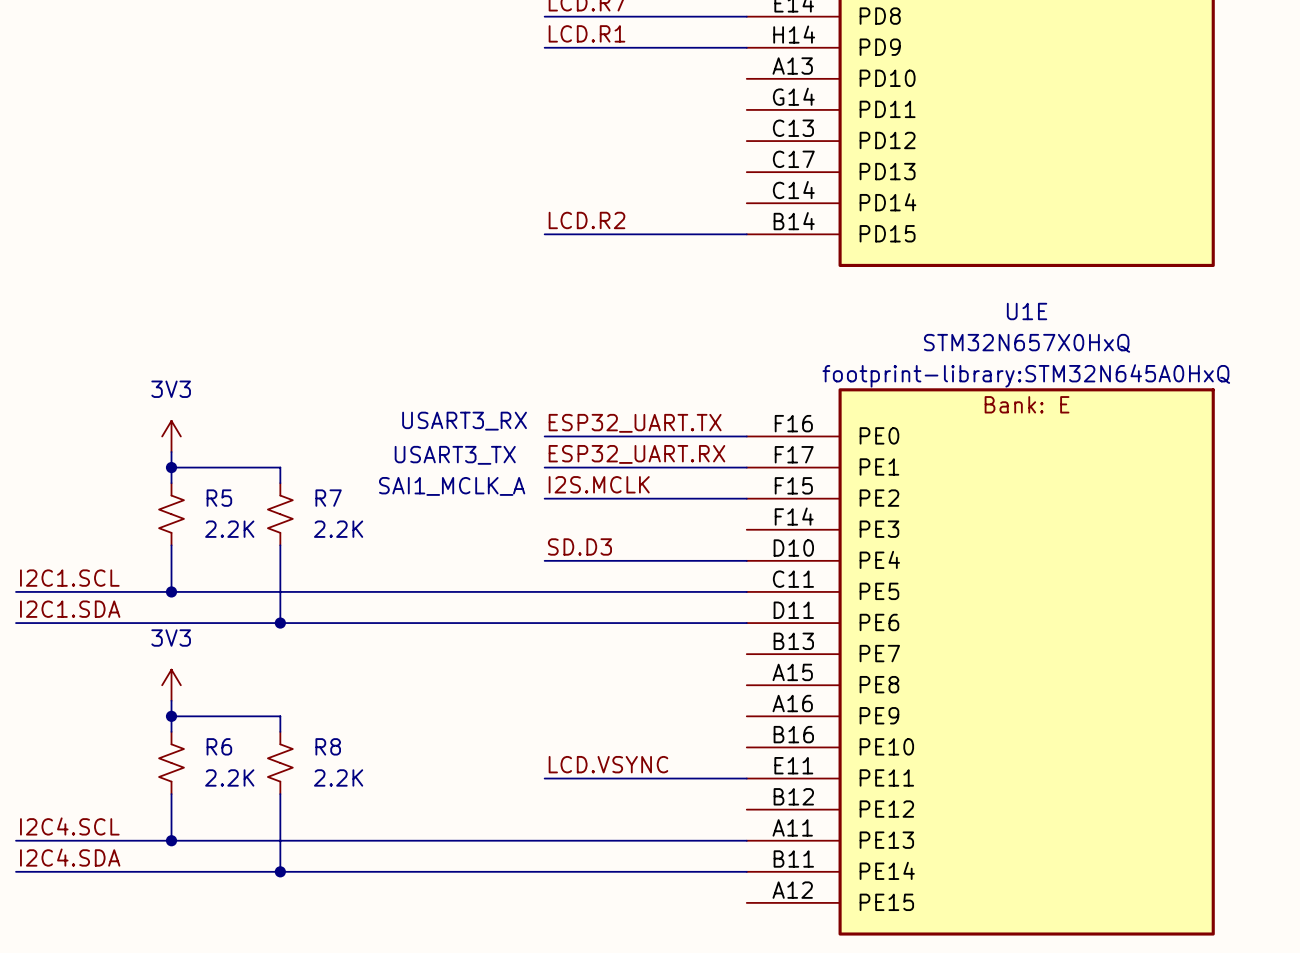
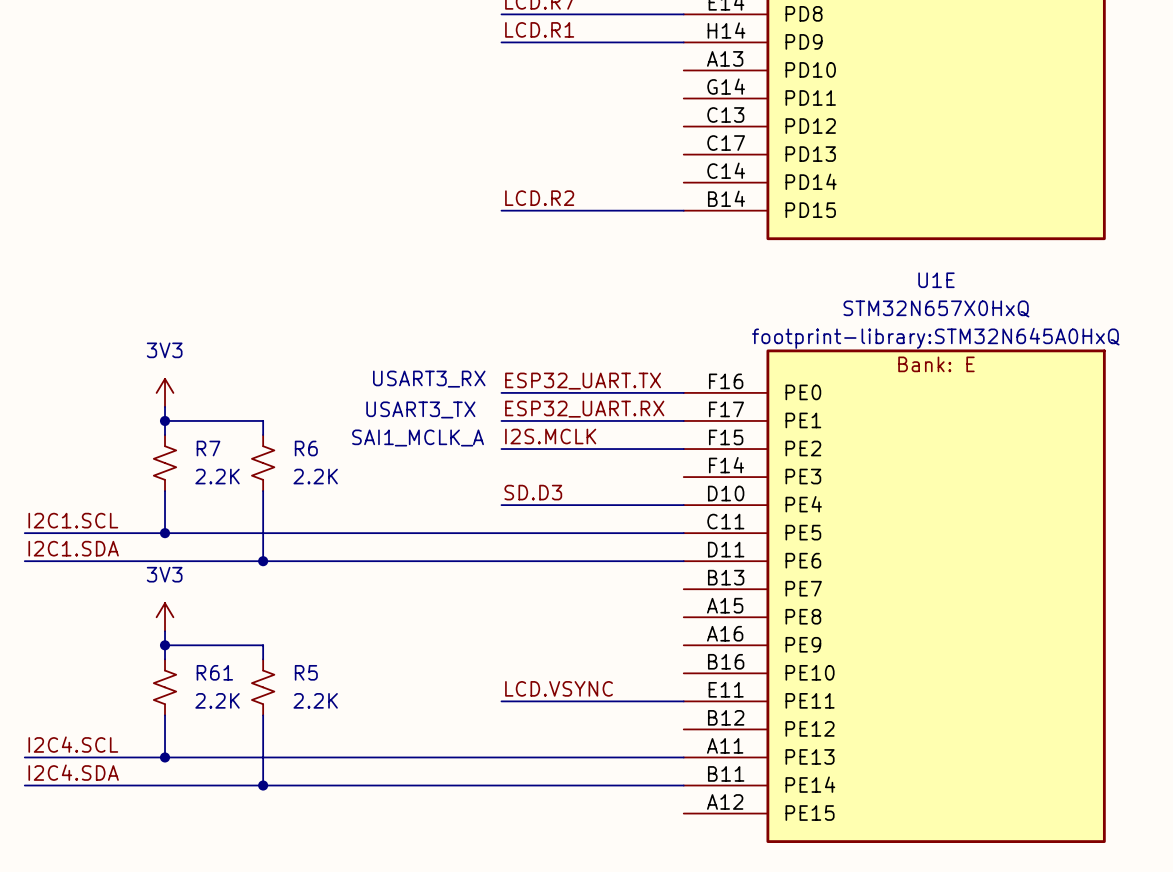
R5 name: R5 (219, 498) -> R7 (208, 448)
R7 name: R7 (328, 498) -> R6 (306, 448)
R6 name: R6 (219, 746) -> R61 (214, 672)
R8 name: R8 (328, 746) -> R5 (306, 672)

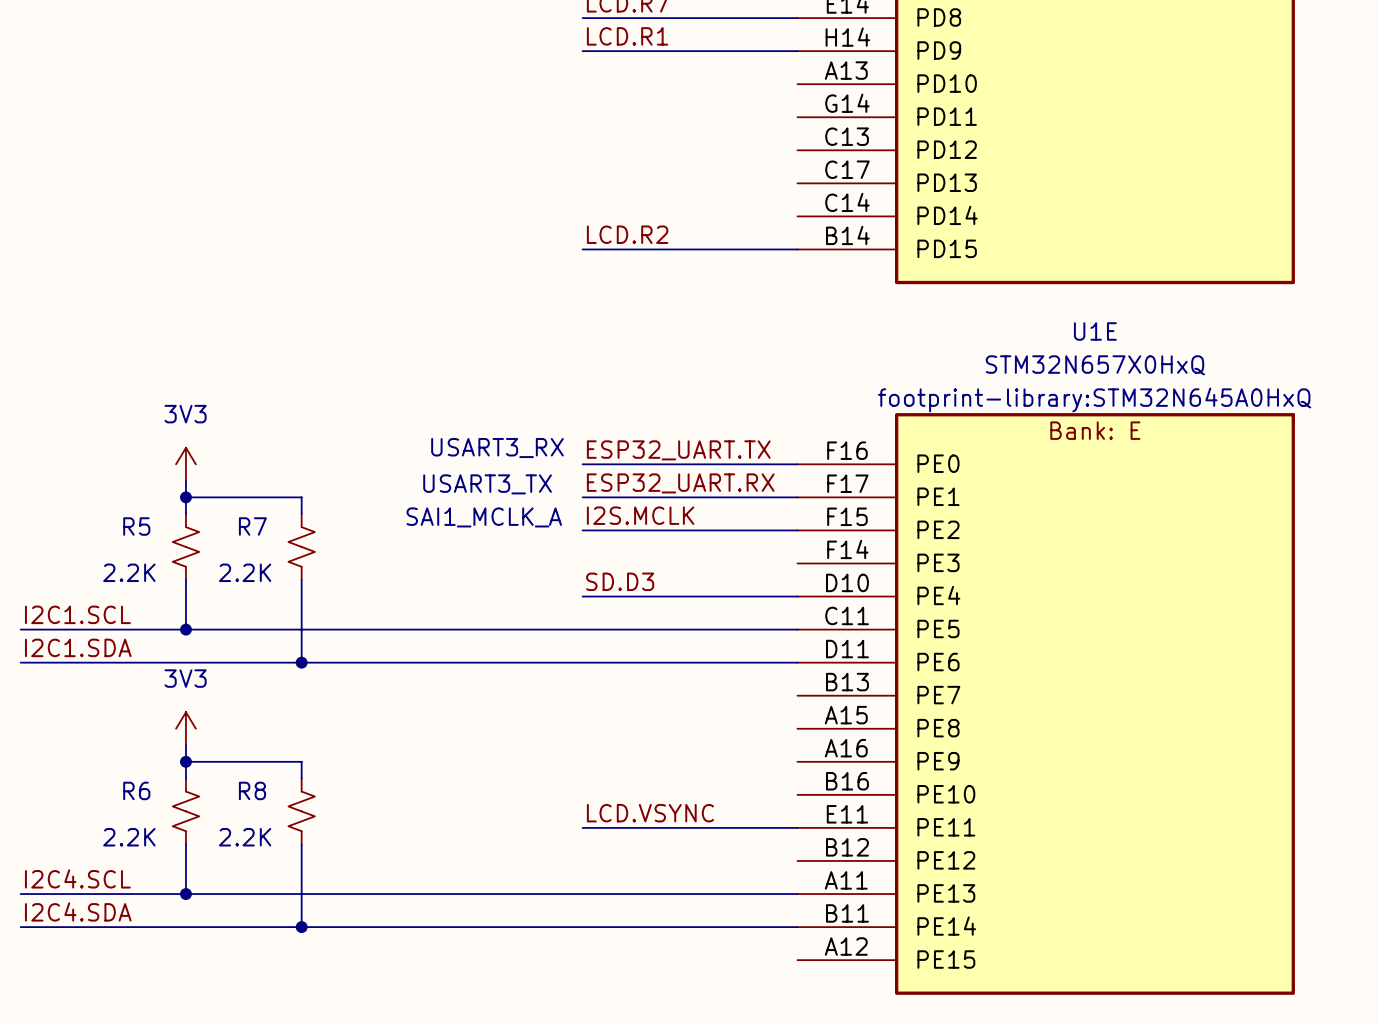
R7 name: R7 (208, 448) -> R5 (136, 526)
R6 name: R6 (306, 448) -> R7 (252, 526)
R7 value position: 2.2K (217, 476) -> 2.2K (129, 572)
R6 value position: 2.2K (315, 476) -> 2.2K (245, 572)
R61 name: R61 (214, 672) -> R6 (136, 790)
R5 name: R5 (306, 672) -> R8 (252, 790)
R61 value position: 2.2K (217, 700) -> 2.2K (129, 837)
R5 value position: 2.2K (315, 700) -> 2.2K (245, 837)

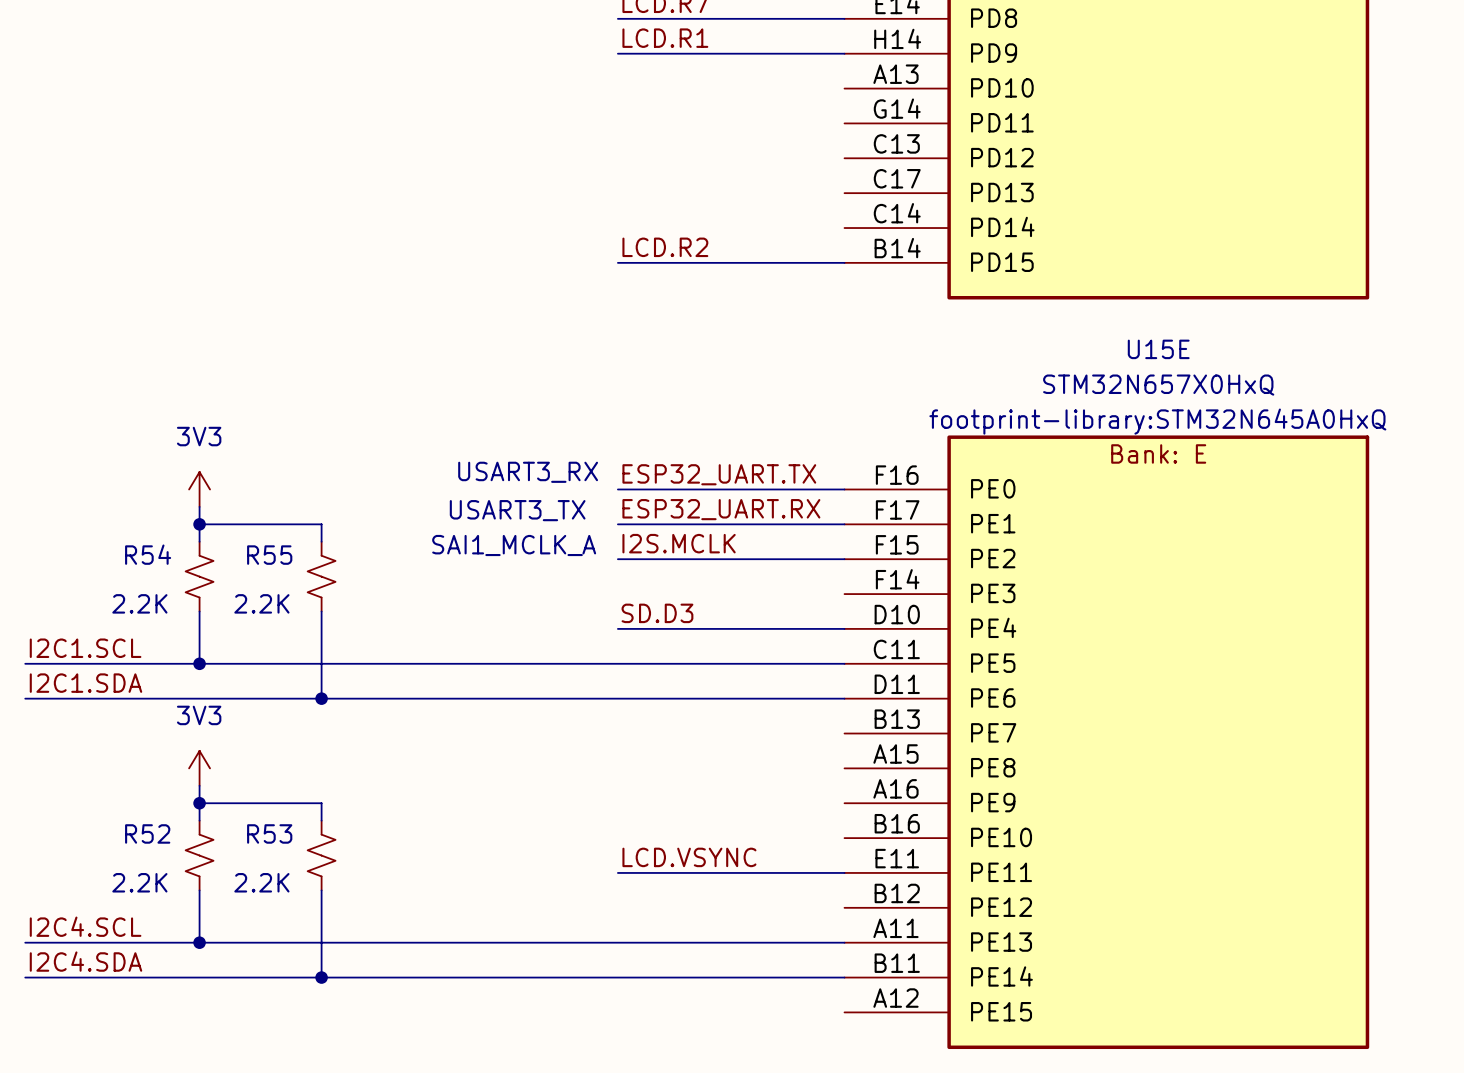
U1E name: U1E (1095, 331) -> U15E (1158, 349)
R5 name: R5 (136, 526) -> R54 (148, 554)
R7 name: R7 (252, 526) -> R55 (269, 555)
R6 name: R6 (136, 790) -> R52 (147, 833)
R8 name: R8 (252, 790) -> R53 (269, 833)

